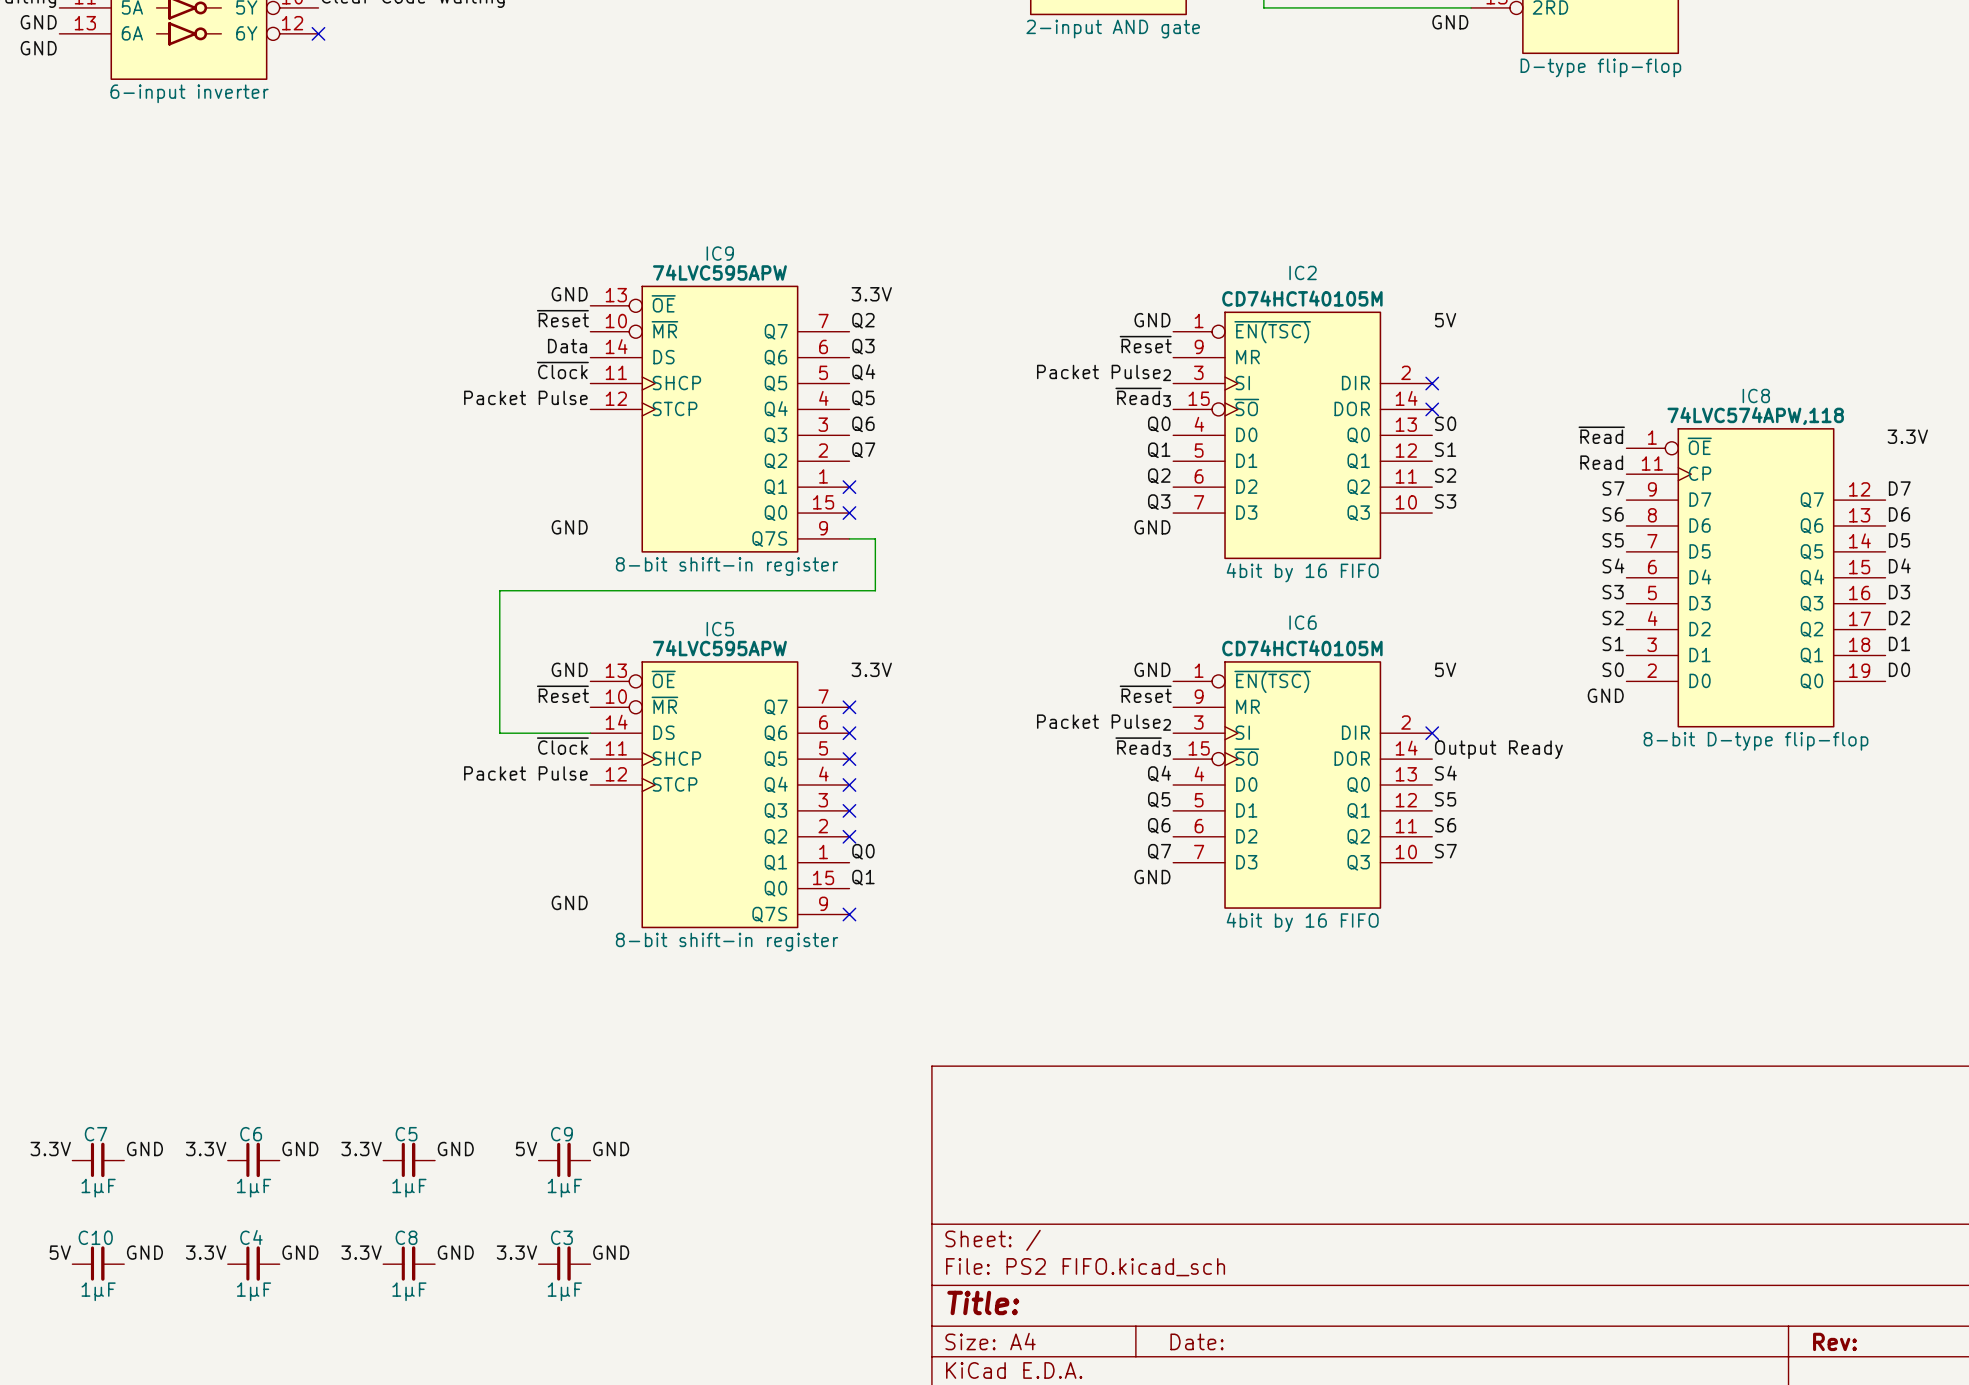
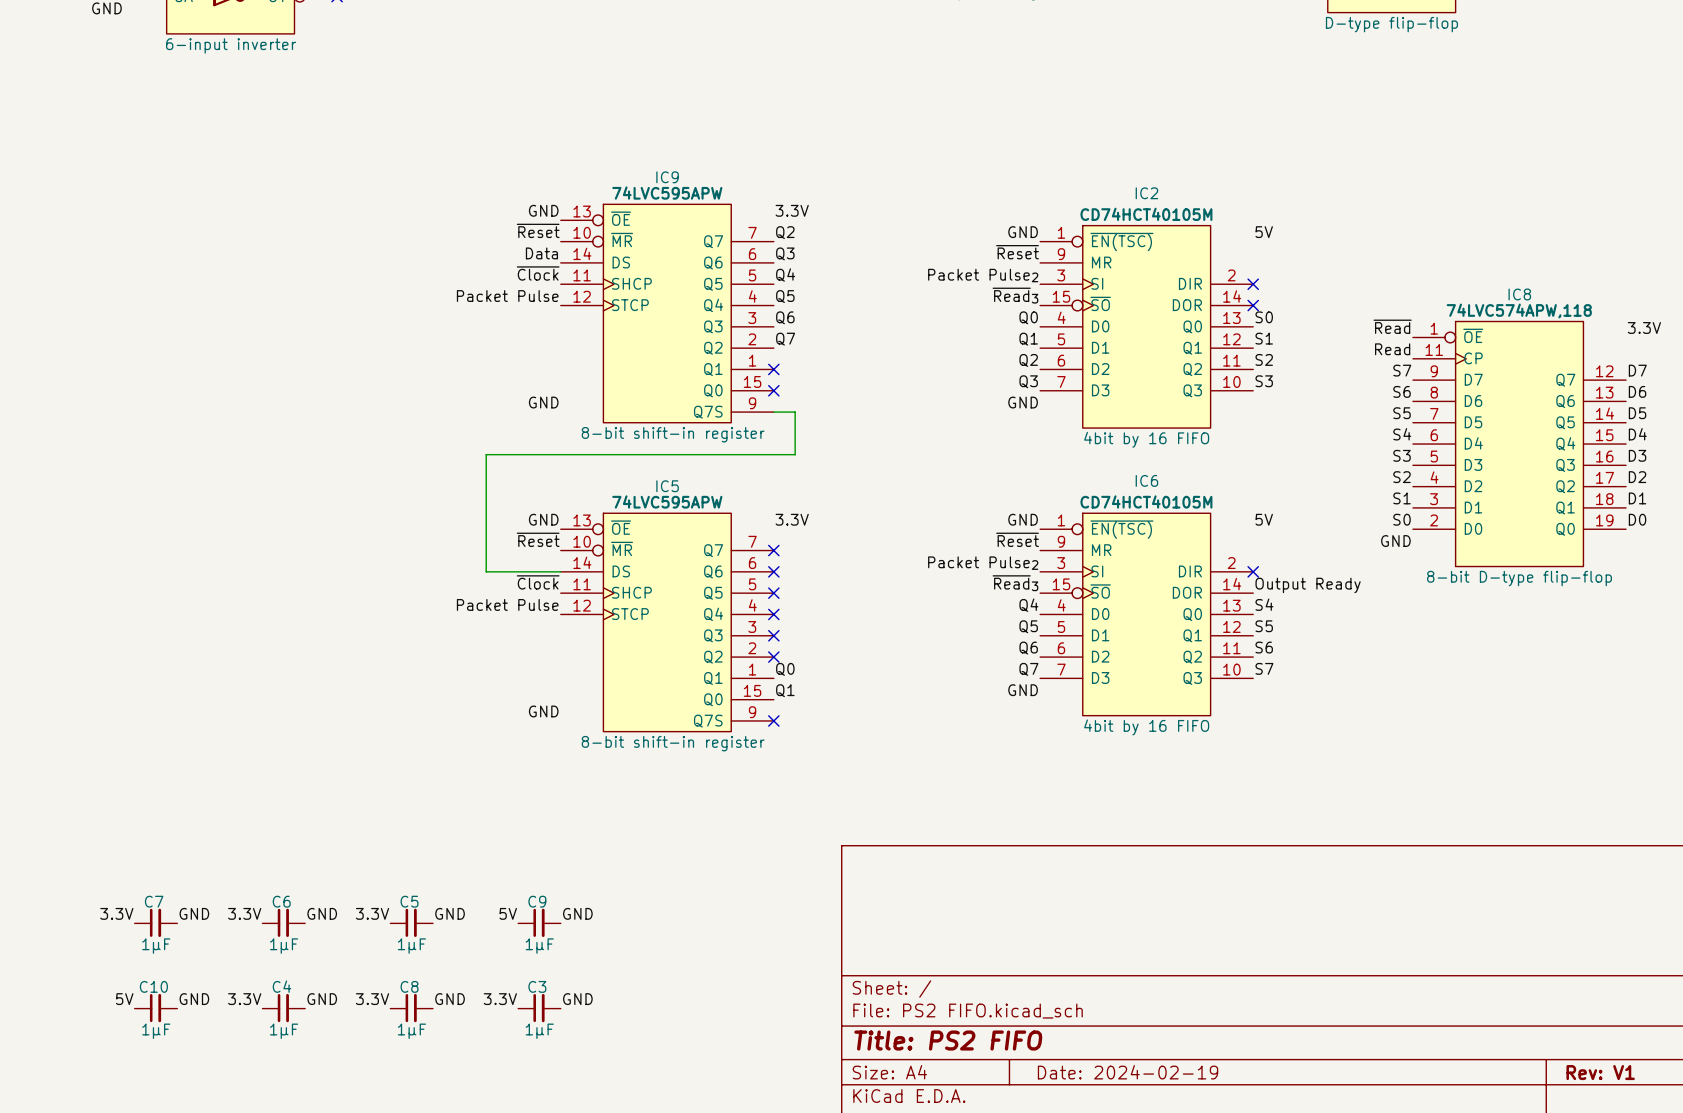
title block: Title: (983, 1302) -> Title: PS2 FIFO (948, 1040)
title block: Date: (1197, 1341) -> Date: 2024-02-19 (1128, 1072)
title block: Rev: (1834, 1341) -> Rev: V1 (1600, 1072)

